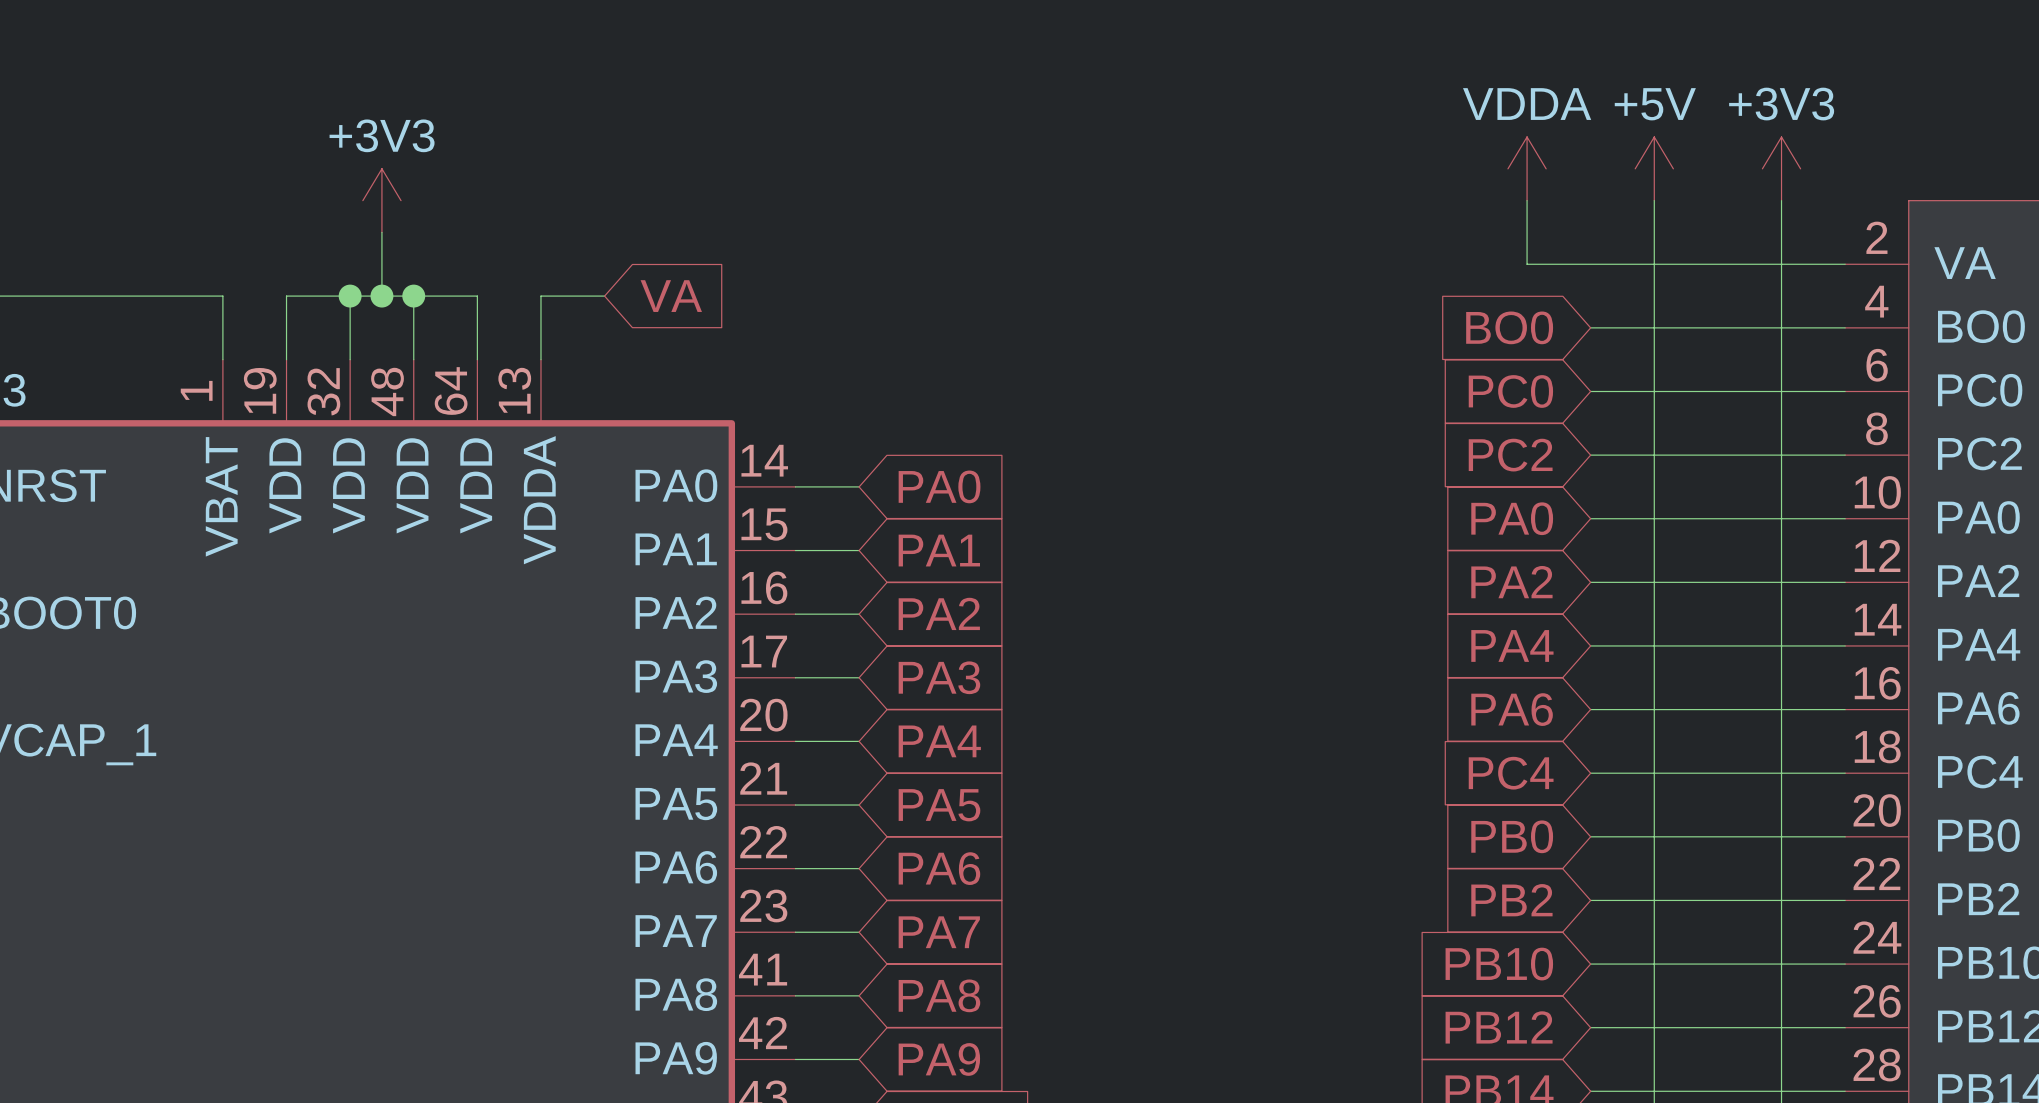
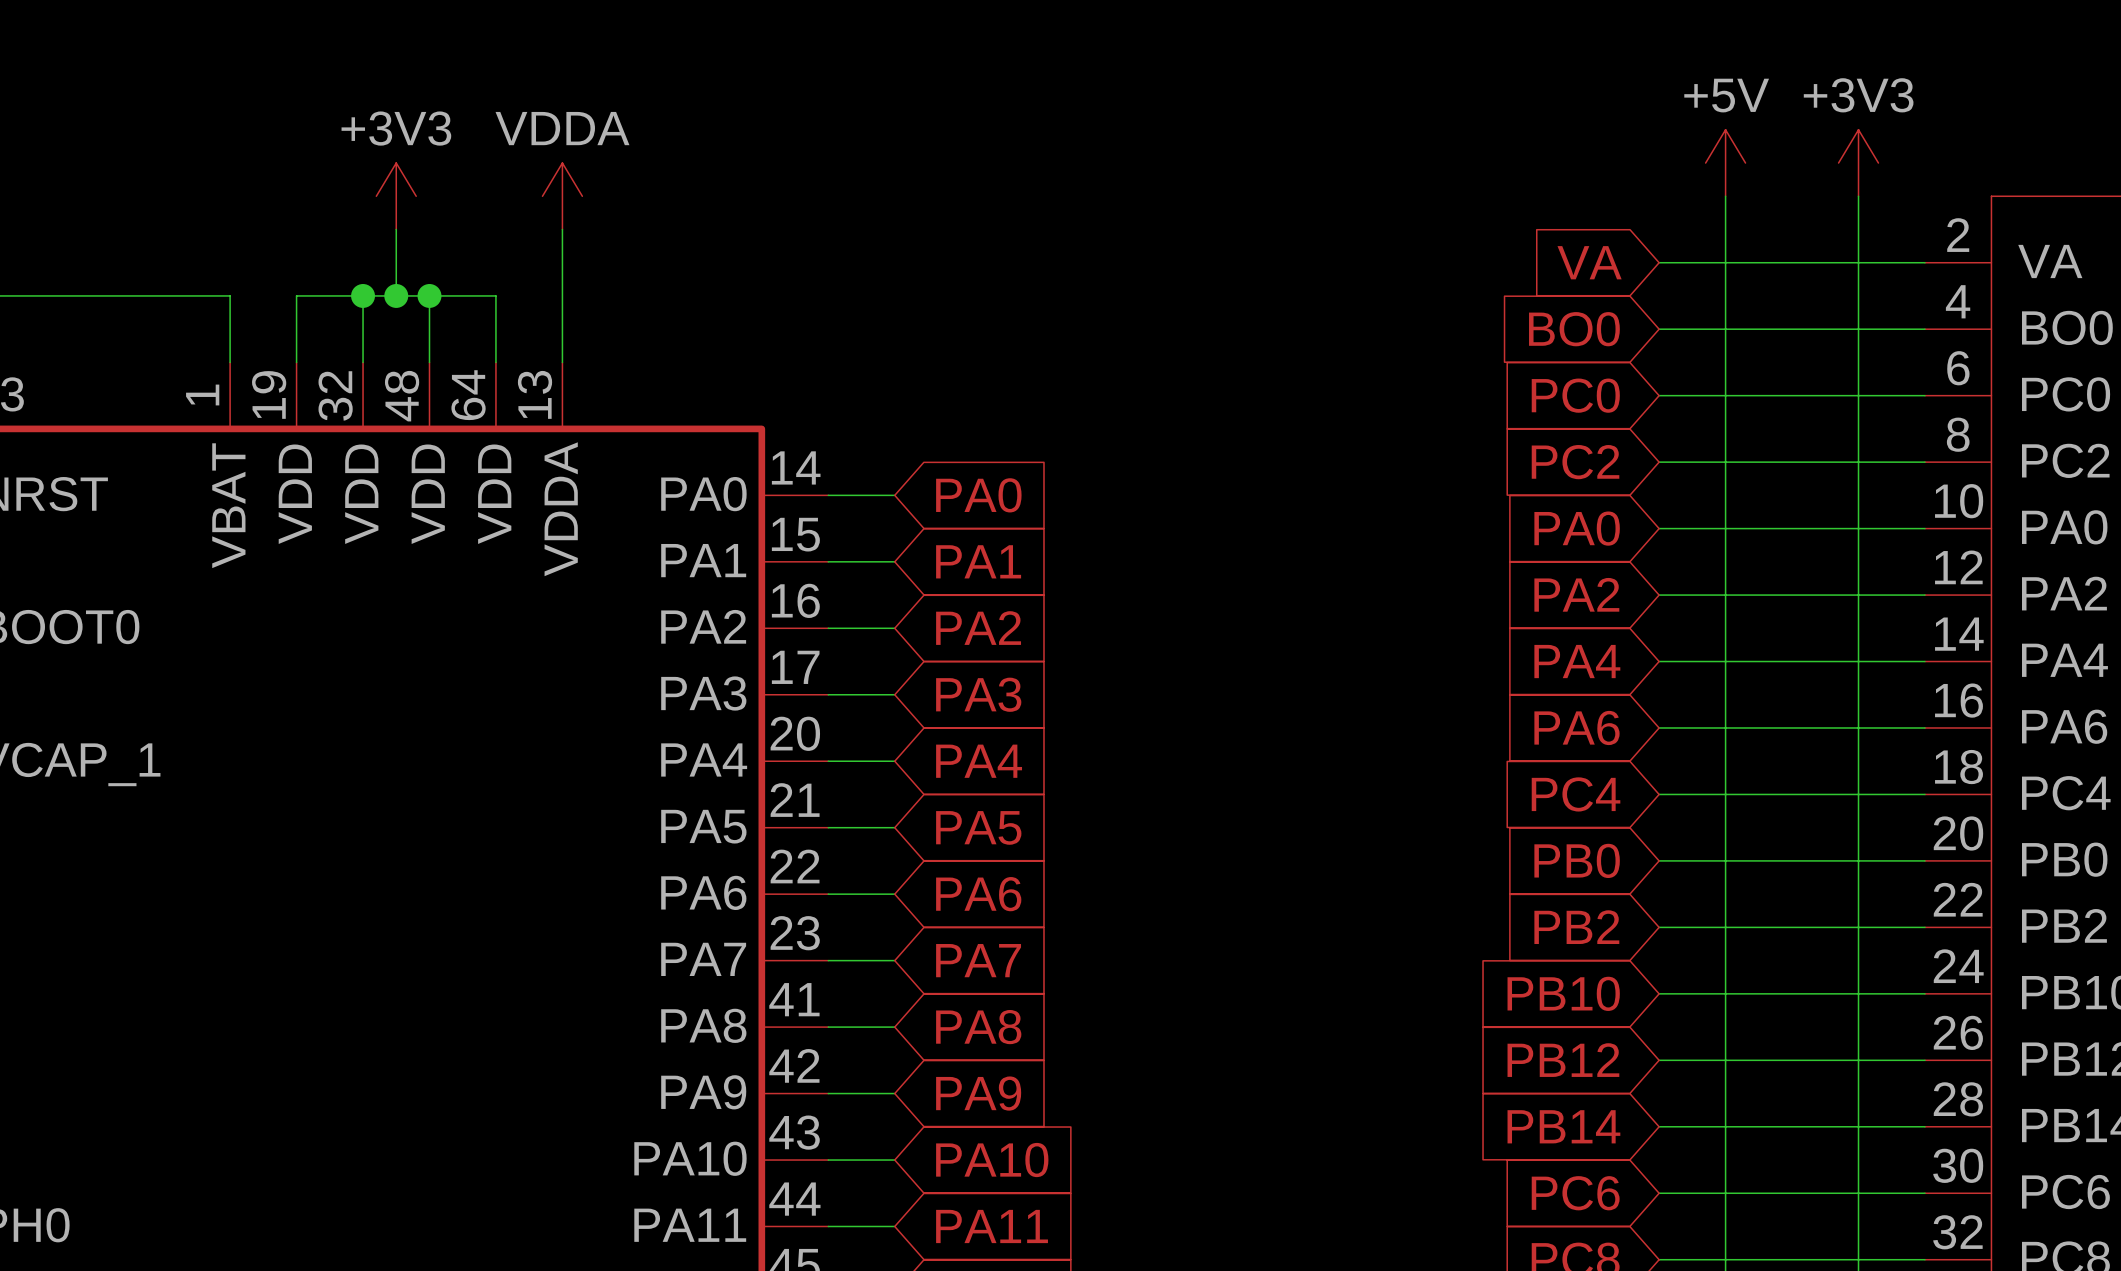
power symbol: VDDA (1527, 168) -> none
power symbol: none -> VDDA (562, 196)
wire: (1527, 200) (1527, 264) (1590, 264) -> none
global label: none -> VA (1589, 262)
wire: (540, 296) (604, 296) -> (562, 295) (562, 229)
global label: VA (671, 296) -> none

